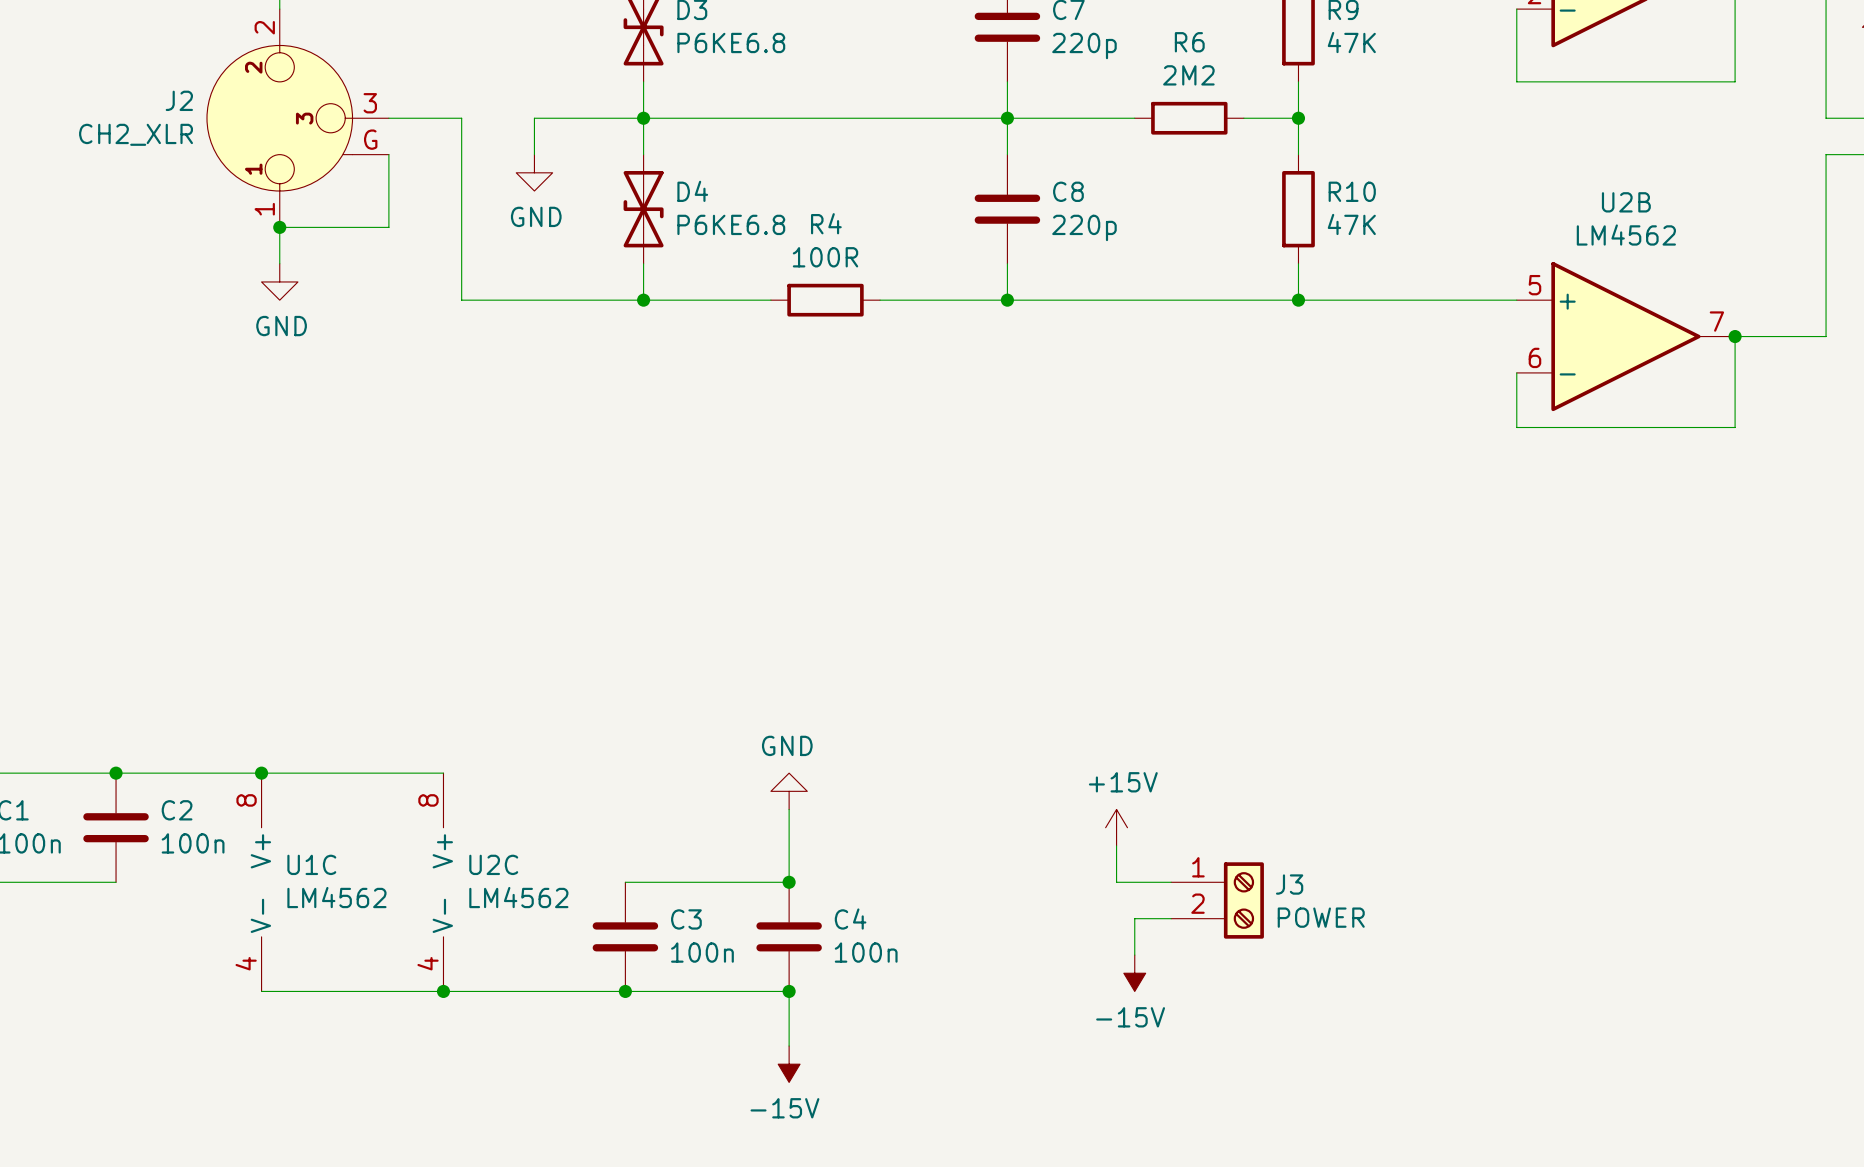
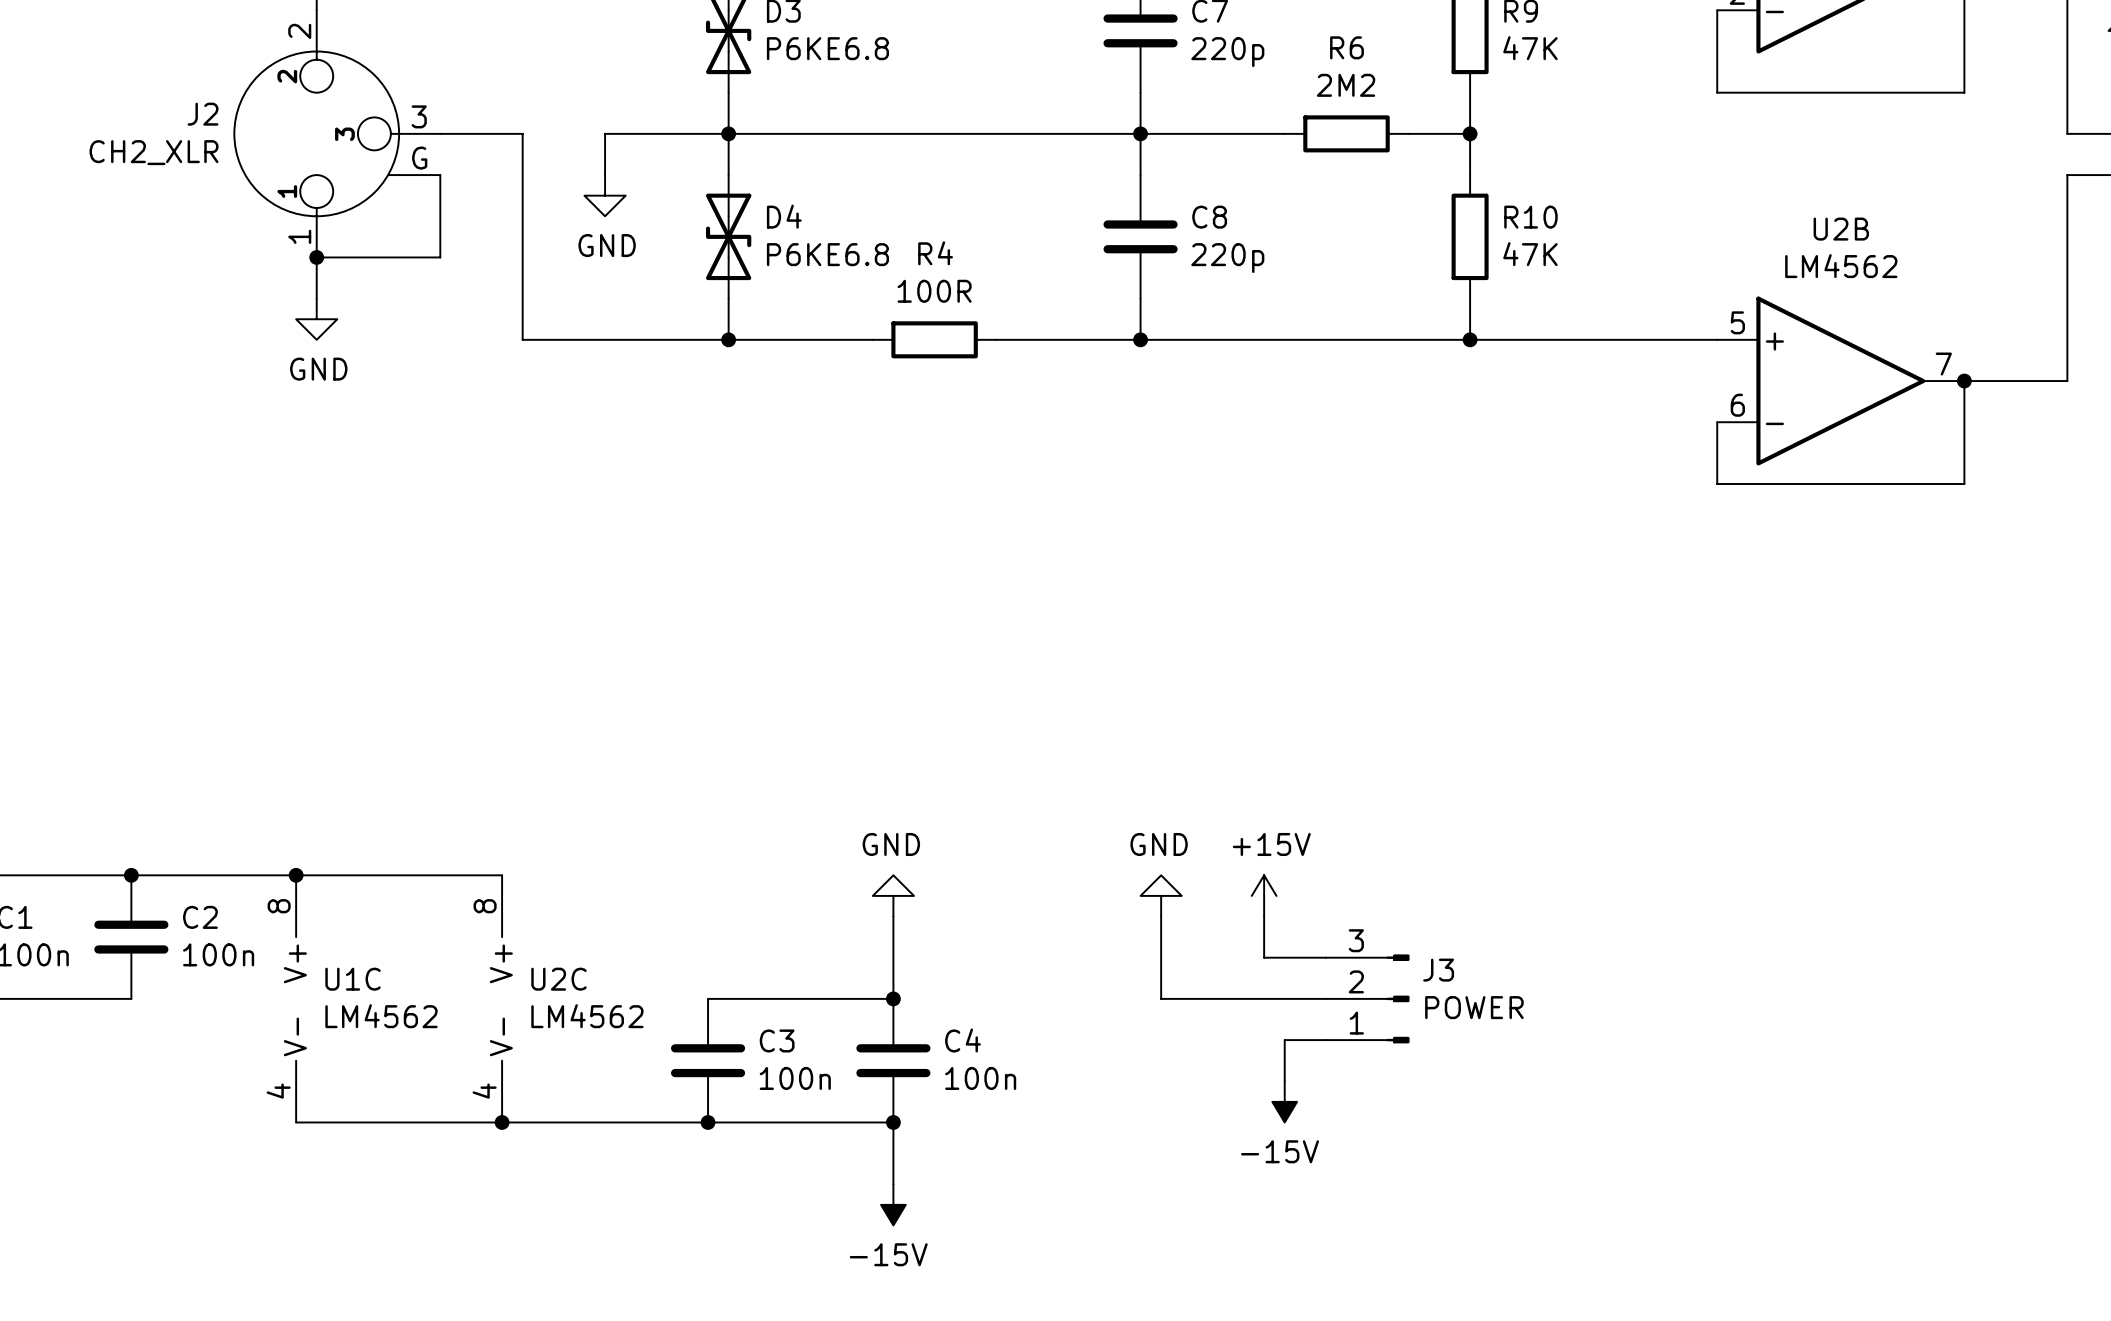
power symbol: none -> GND (1161, 895)
wire: none -> (1264, 916) (1264, 957) (1325, 957)
power symbol position: +15V (1116, 827) -> +15V (1264, 895)
wire: (1116, 845) (1116, 882) -> (1161, 916) (1161, 998) (1264, 998)
J3 symbol: [1171, 862, 1264, 939] -> [1325, 954, 1410, 1044]

